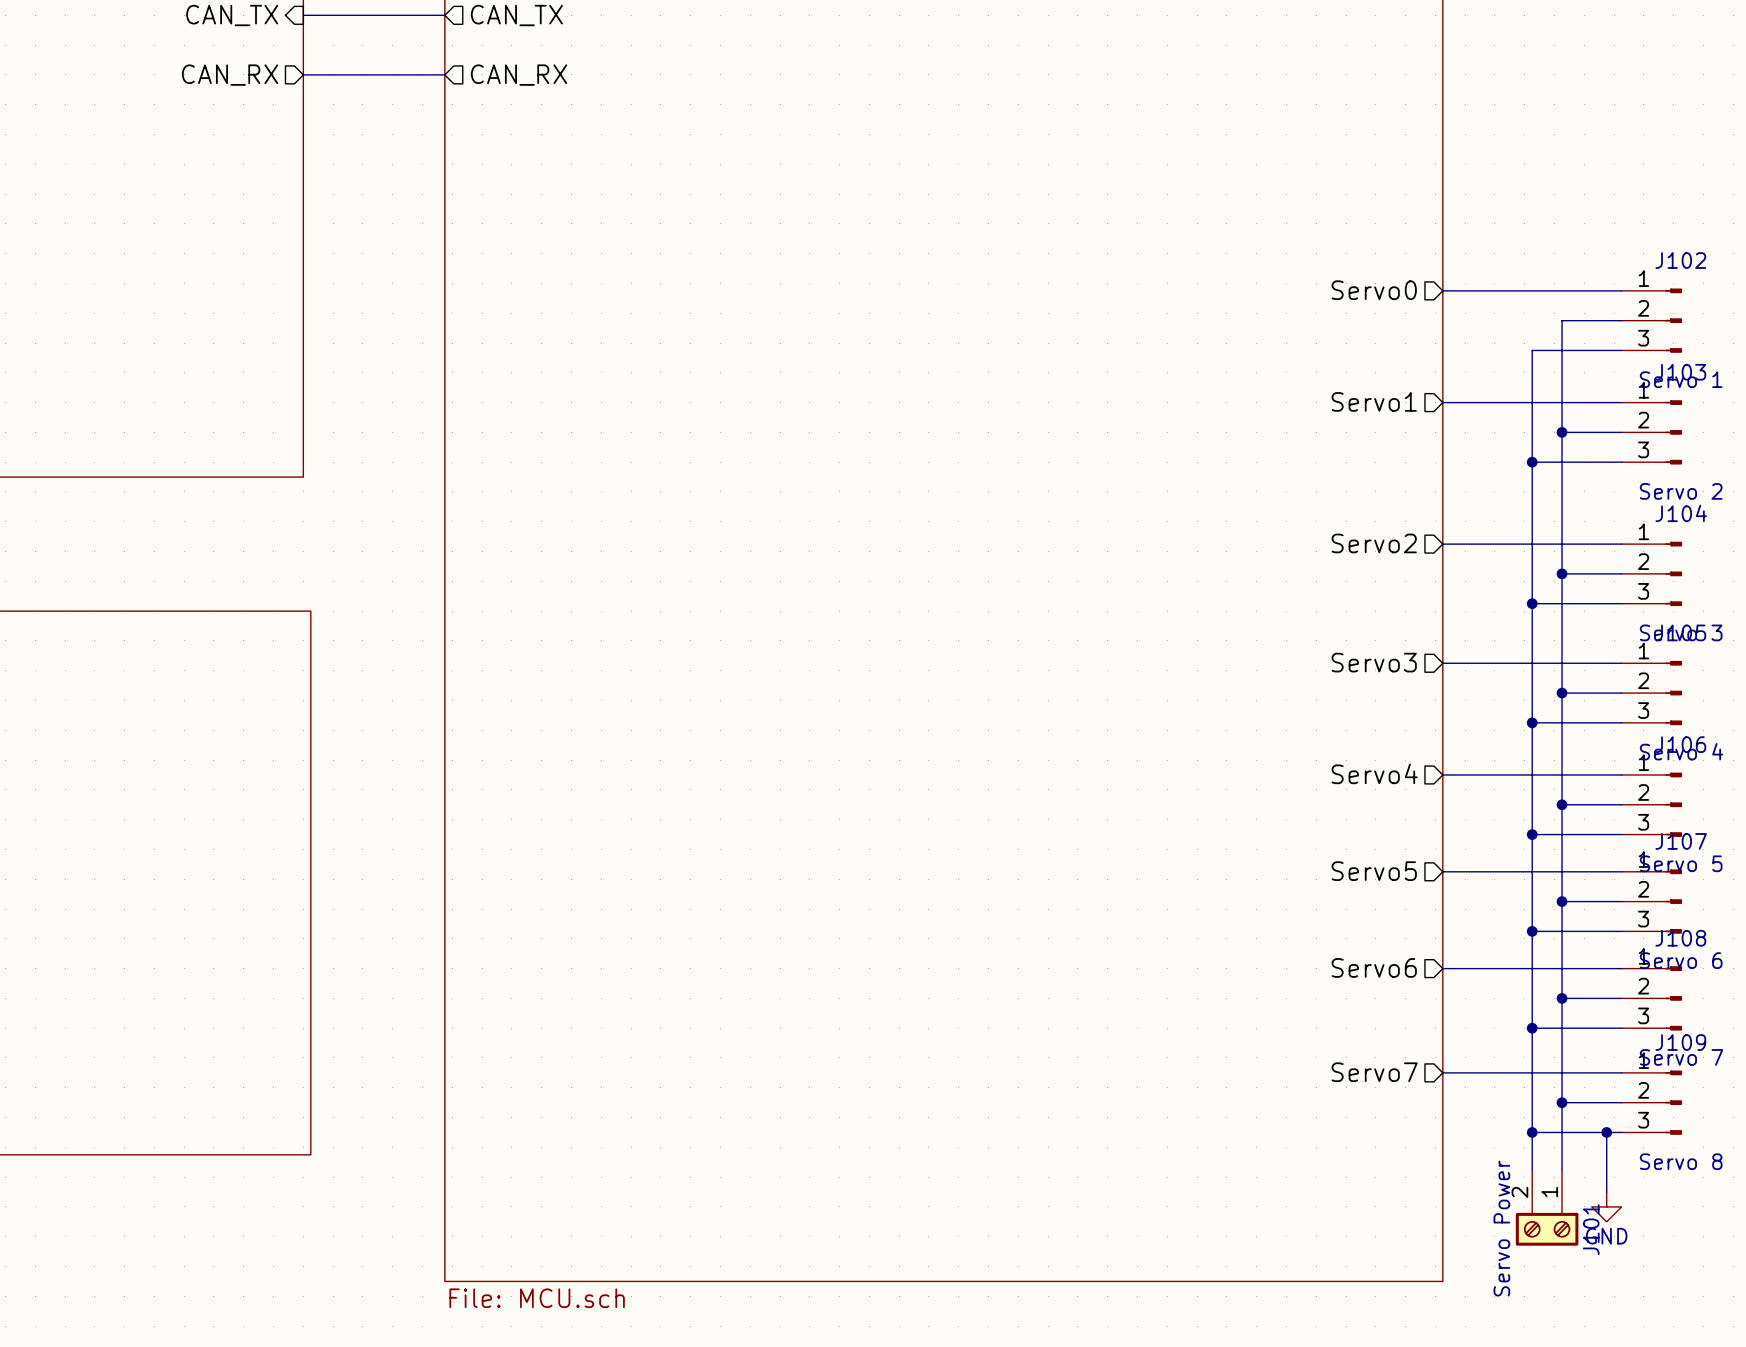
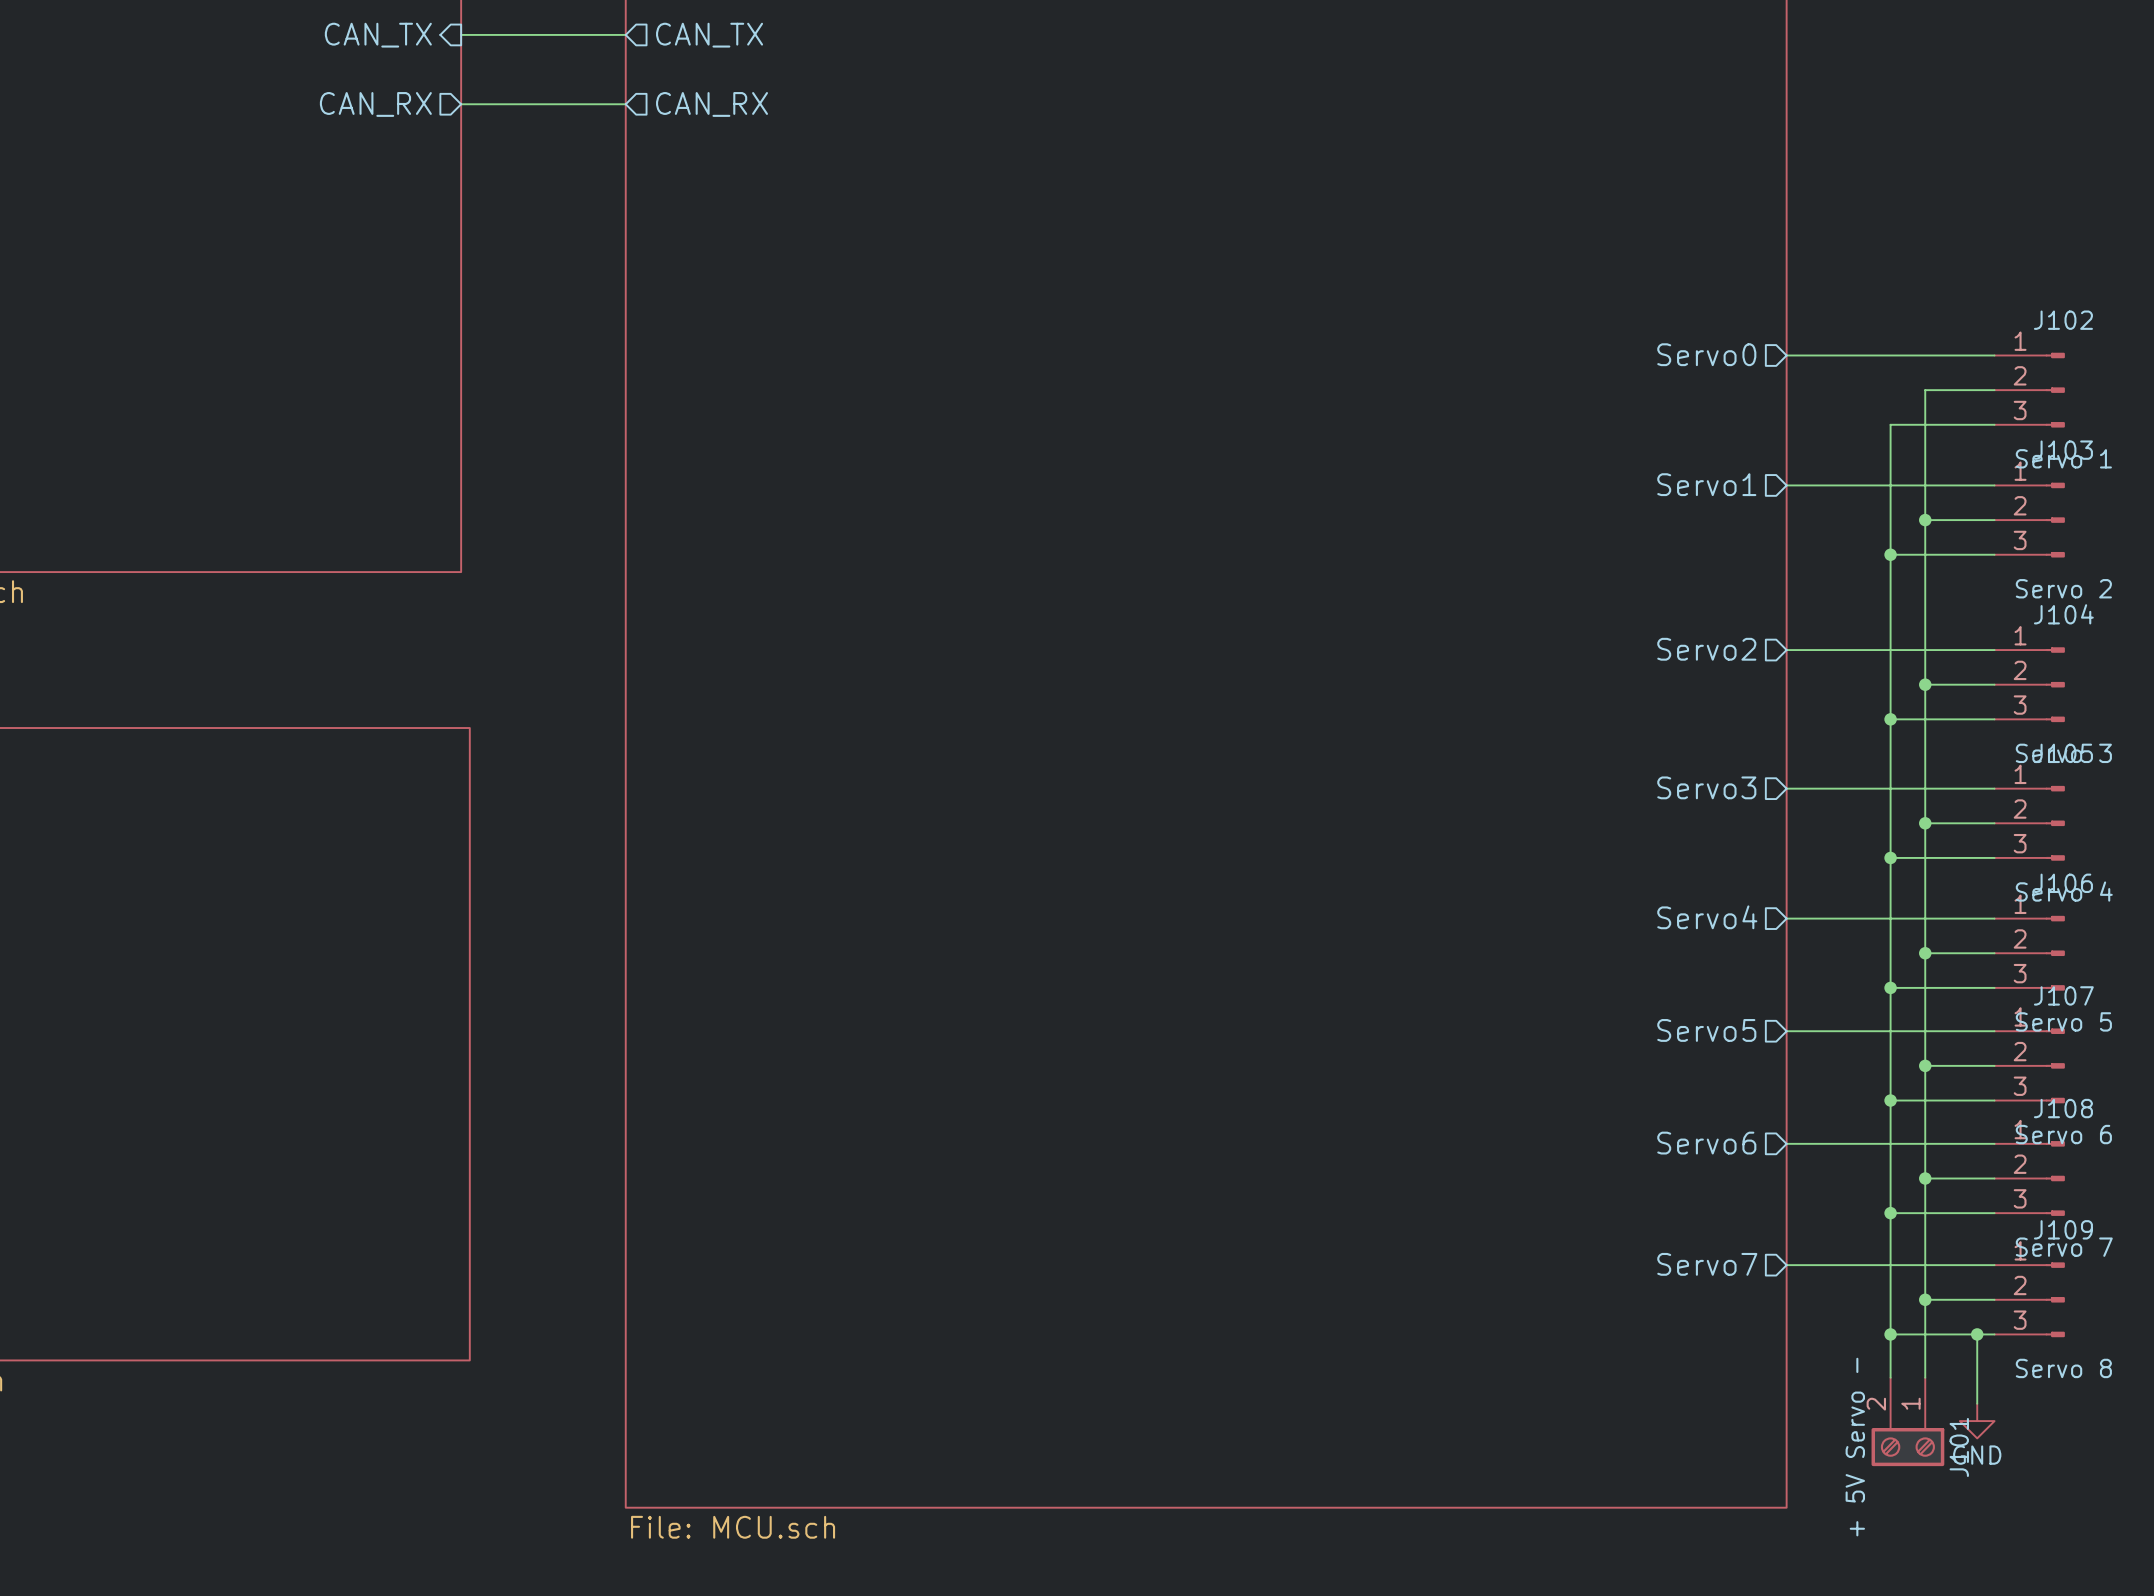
J101 value: Servo Power (1501, 1228) -> + 5V Servo - (1855, 1447)

